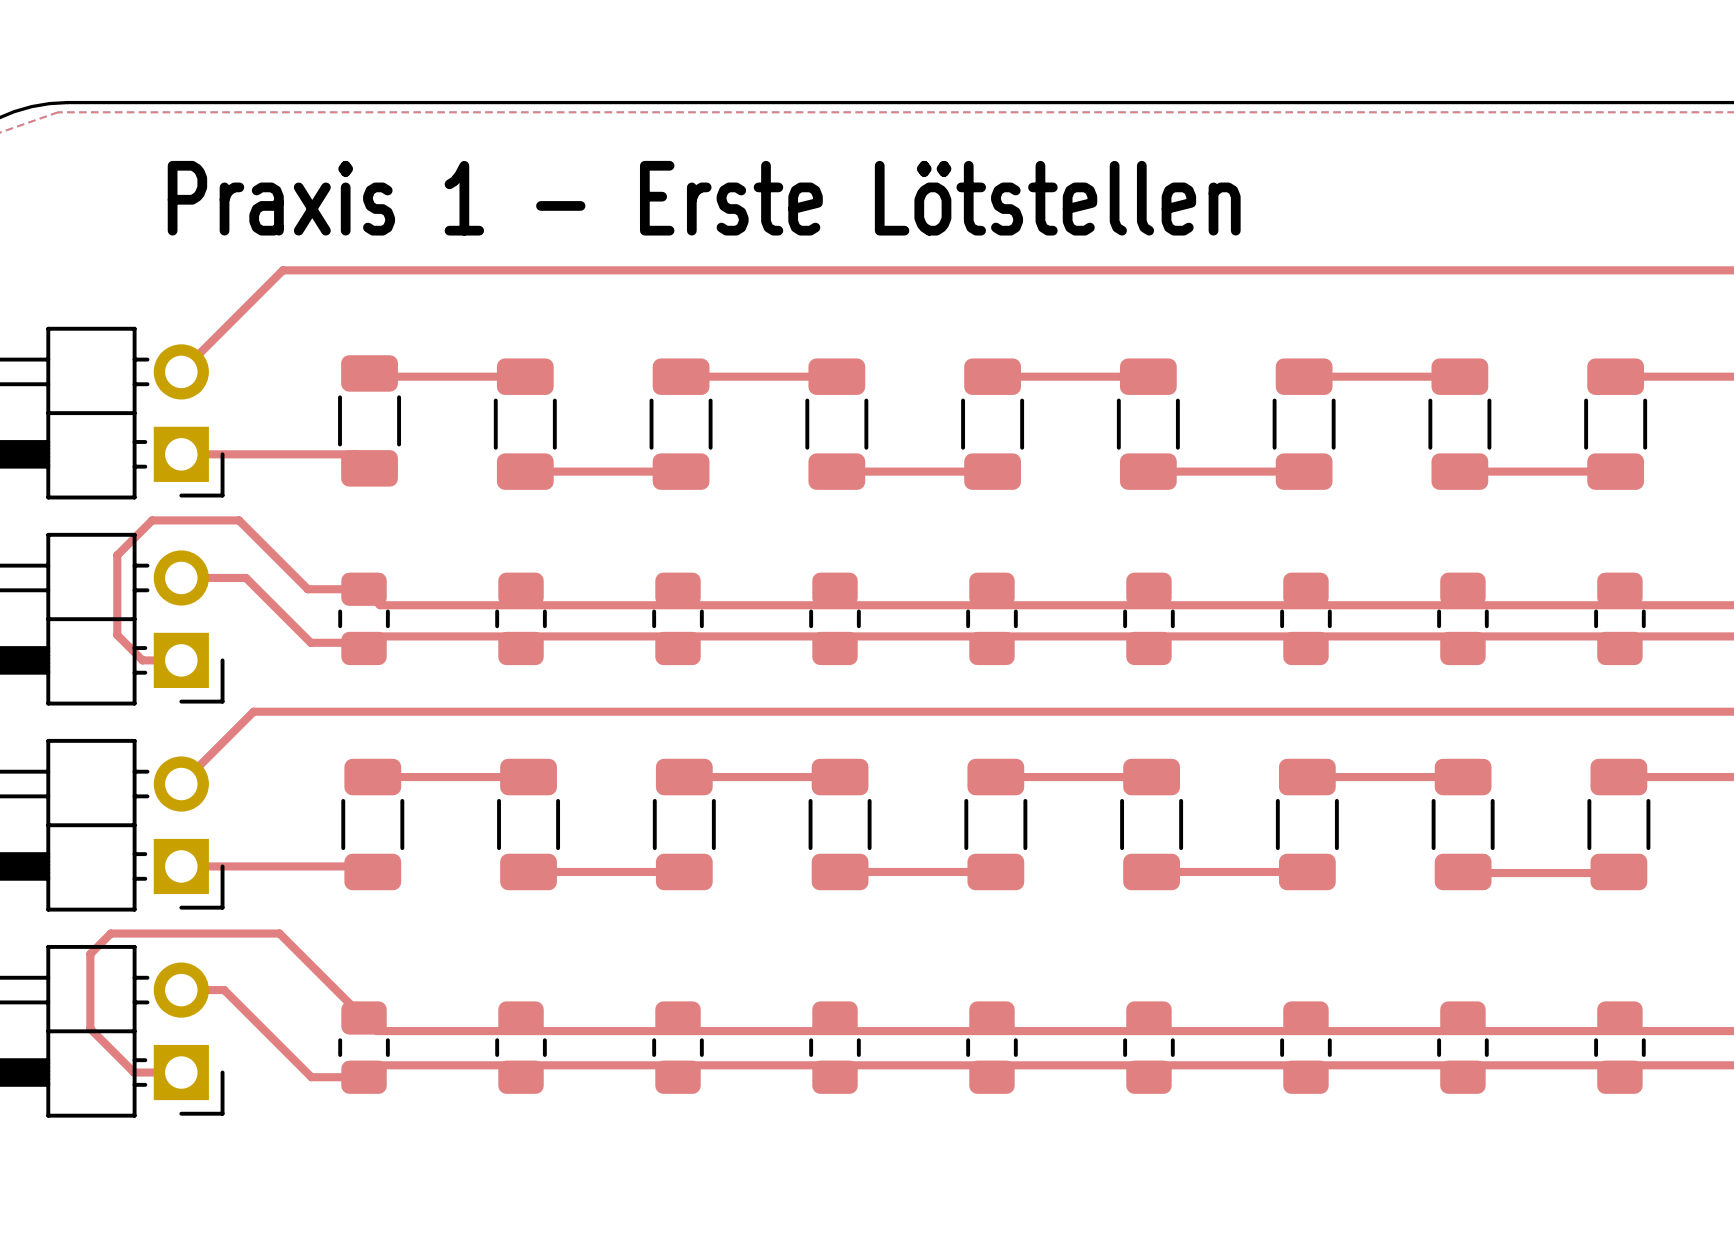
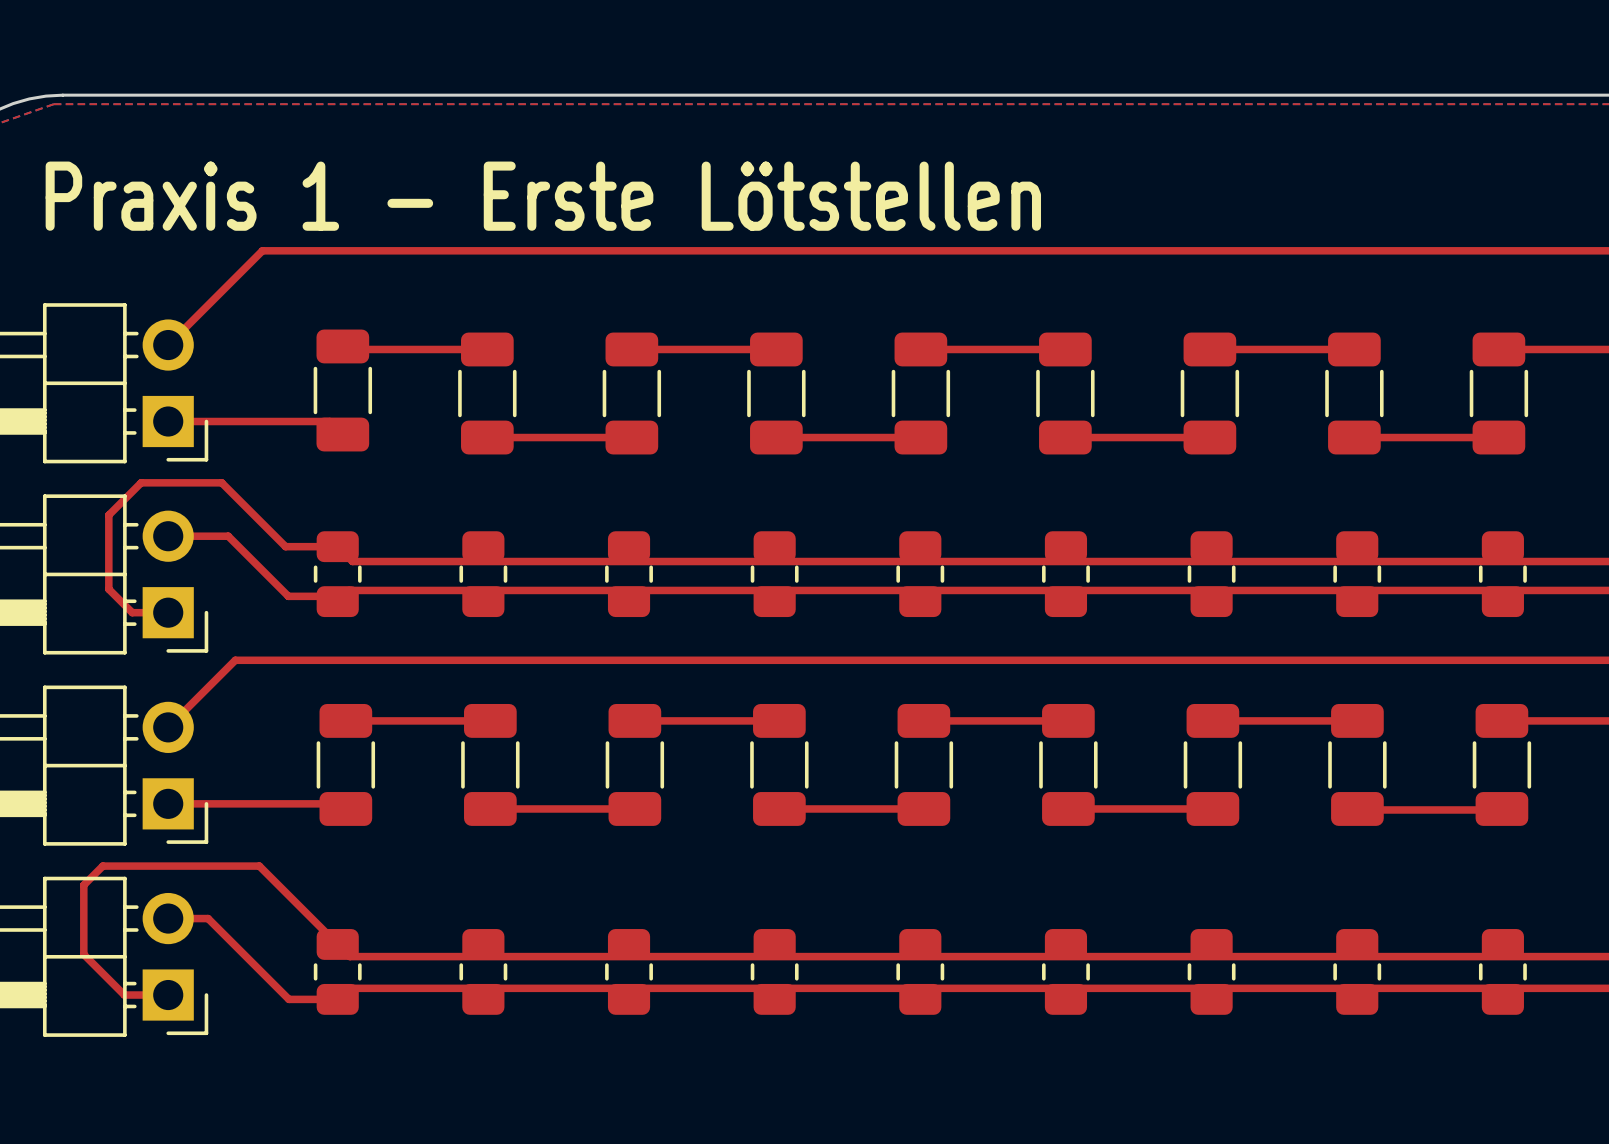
text position: Praxis 1 - Erste Lötstellen (704, 198) -> Praxis 1 - Erste Lötstellen (543, 196)

